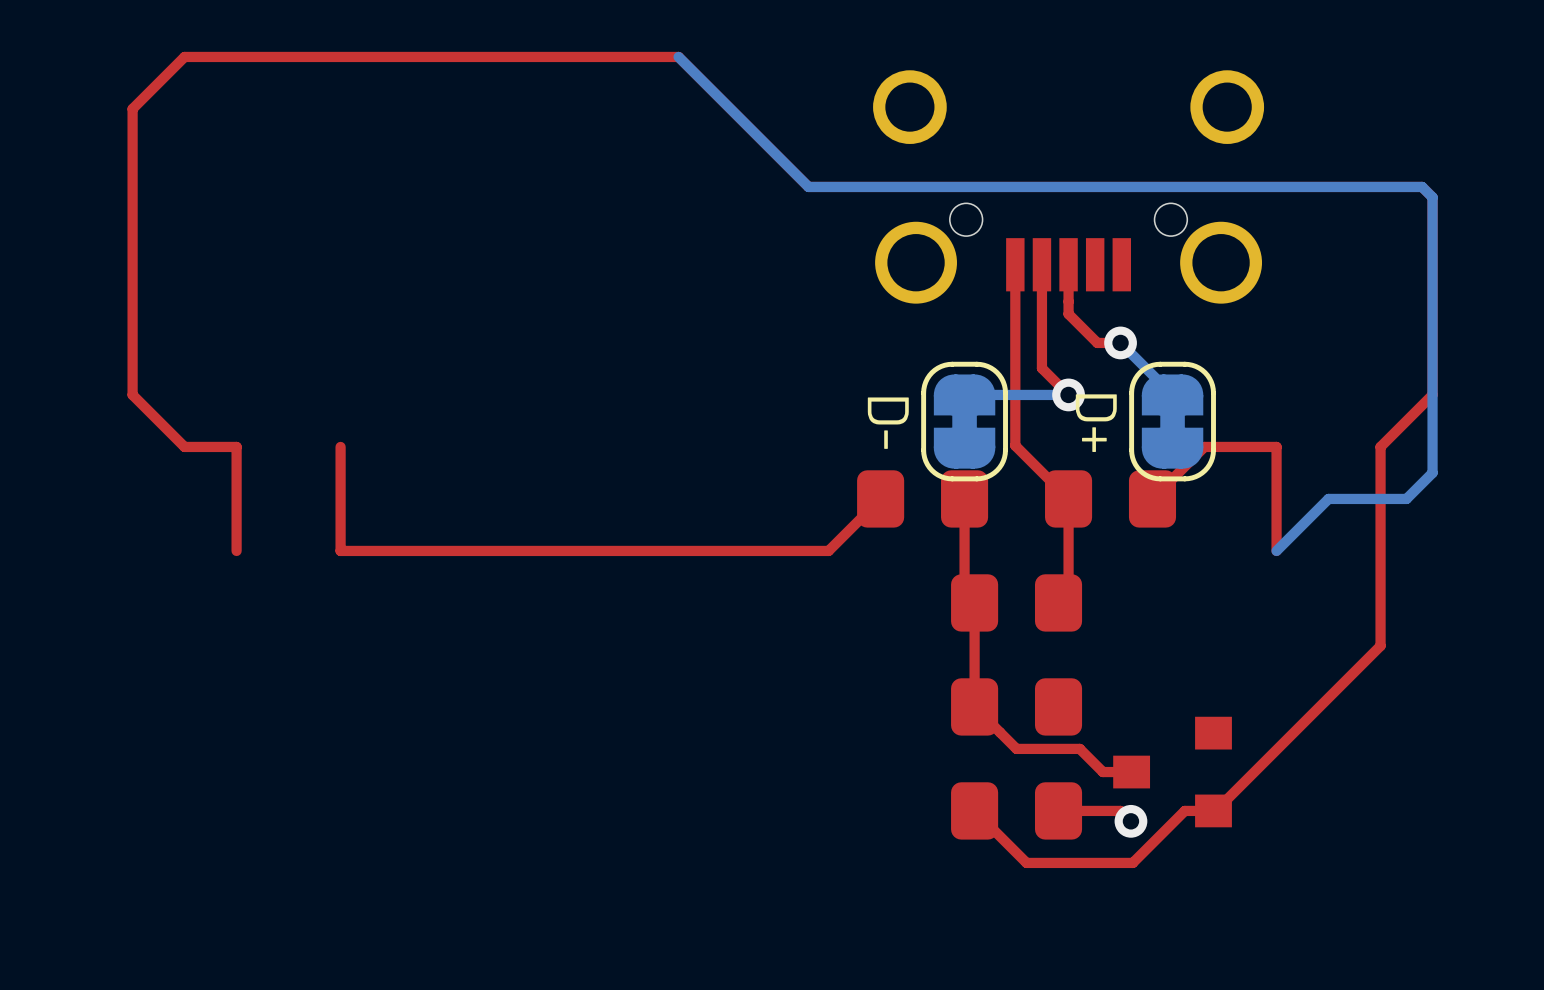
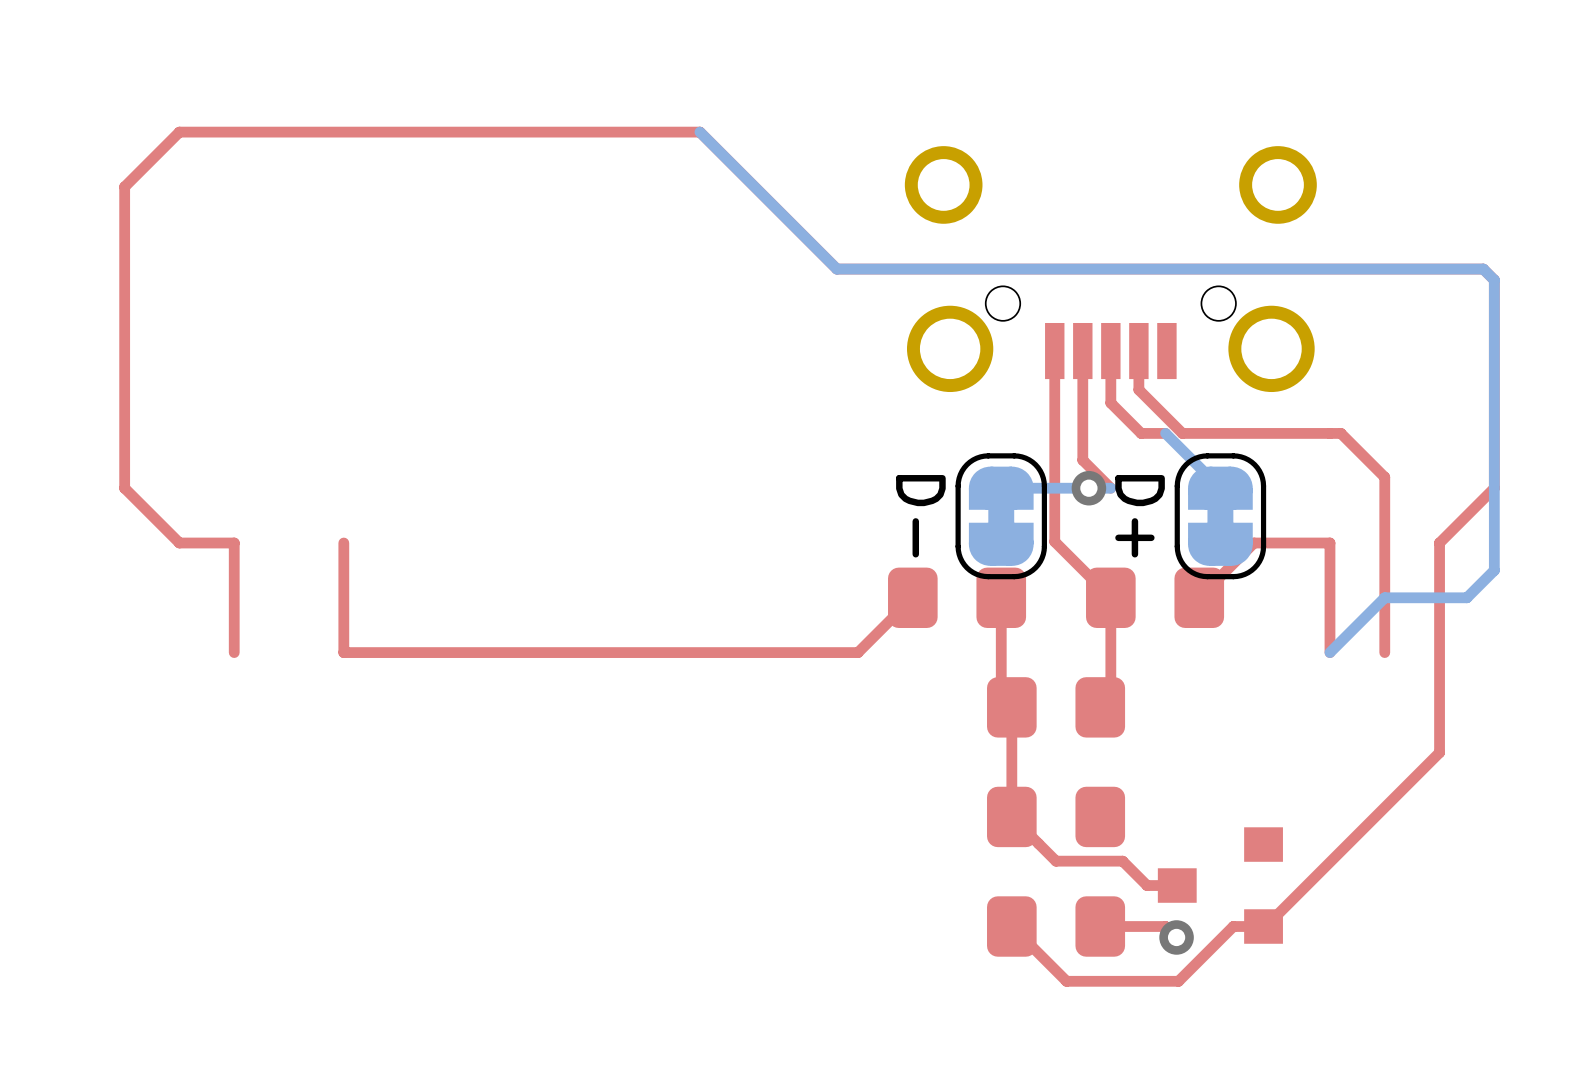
top track: none -> (1138, 351) (1138, 389) (1182, 433) (1340, 433) (1384, 477) (1384, 652)
via: (1120, 342) -> none
via position: (1068, 394) -> (1088, 488)

